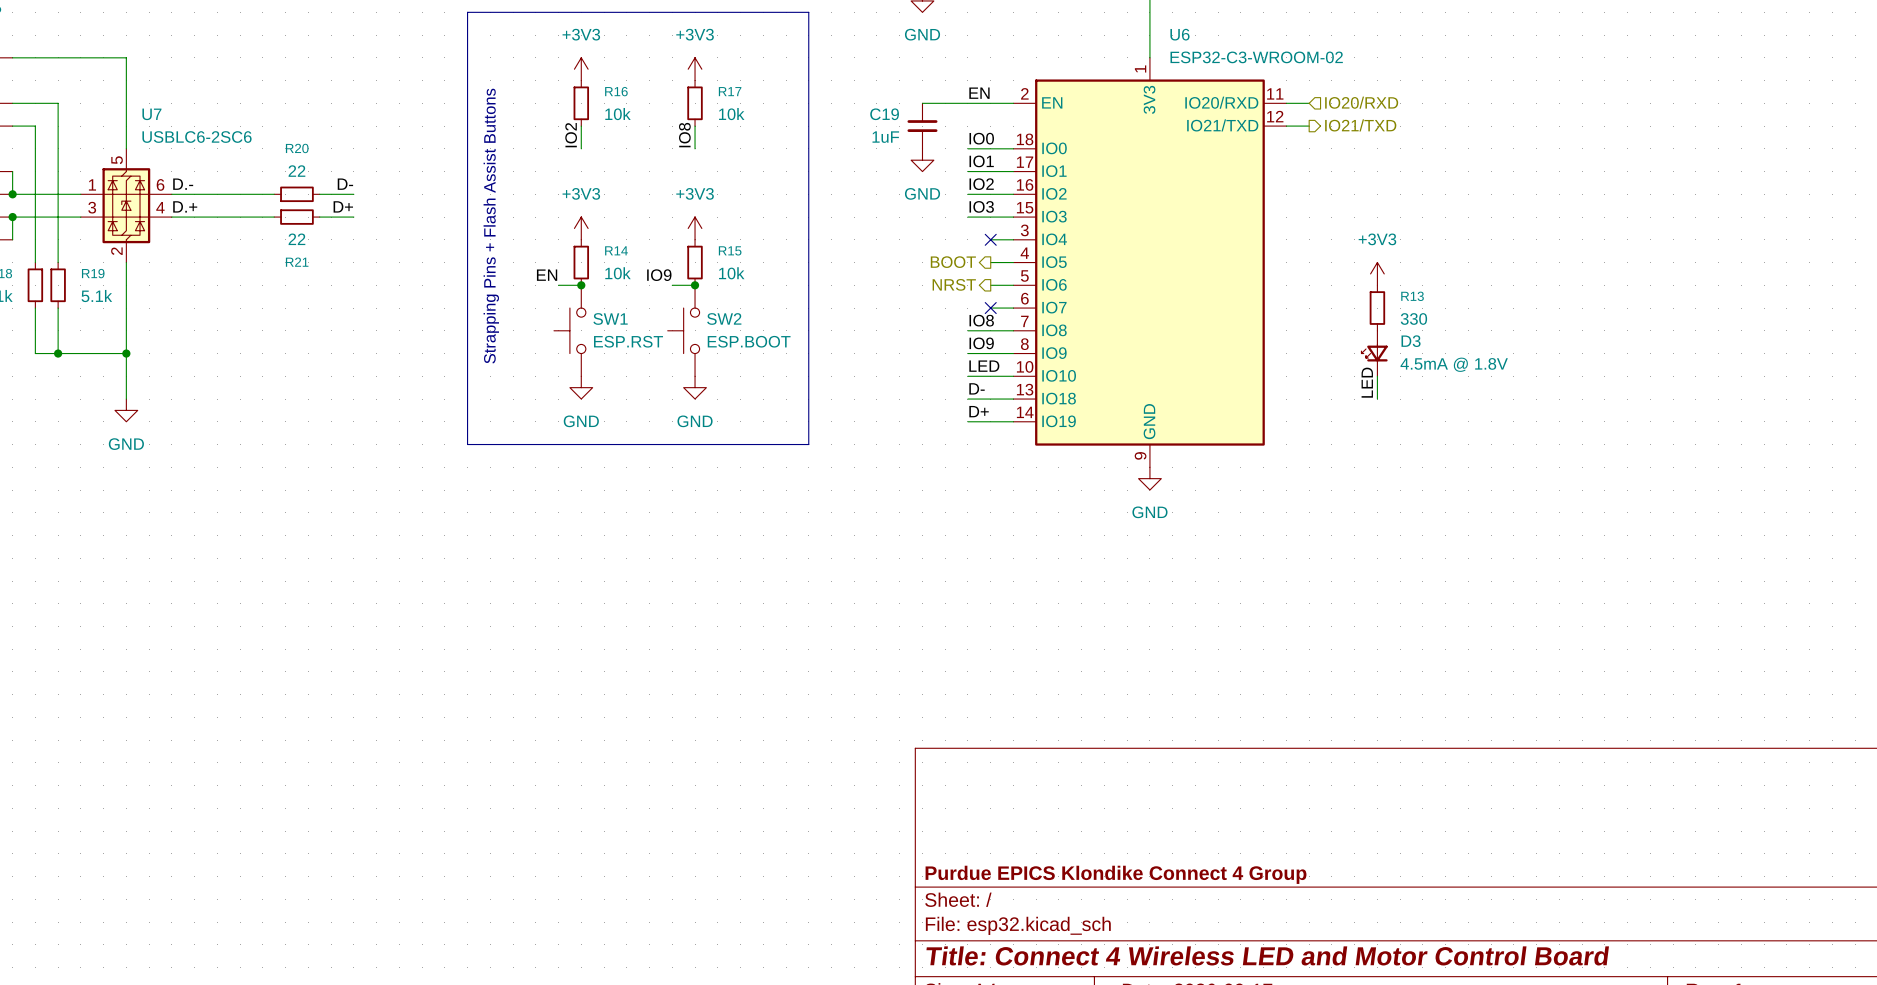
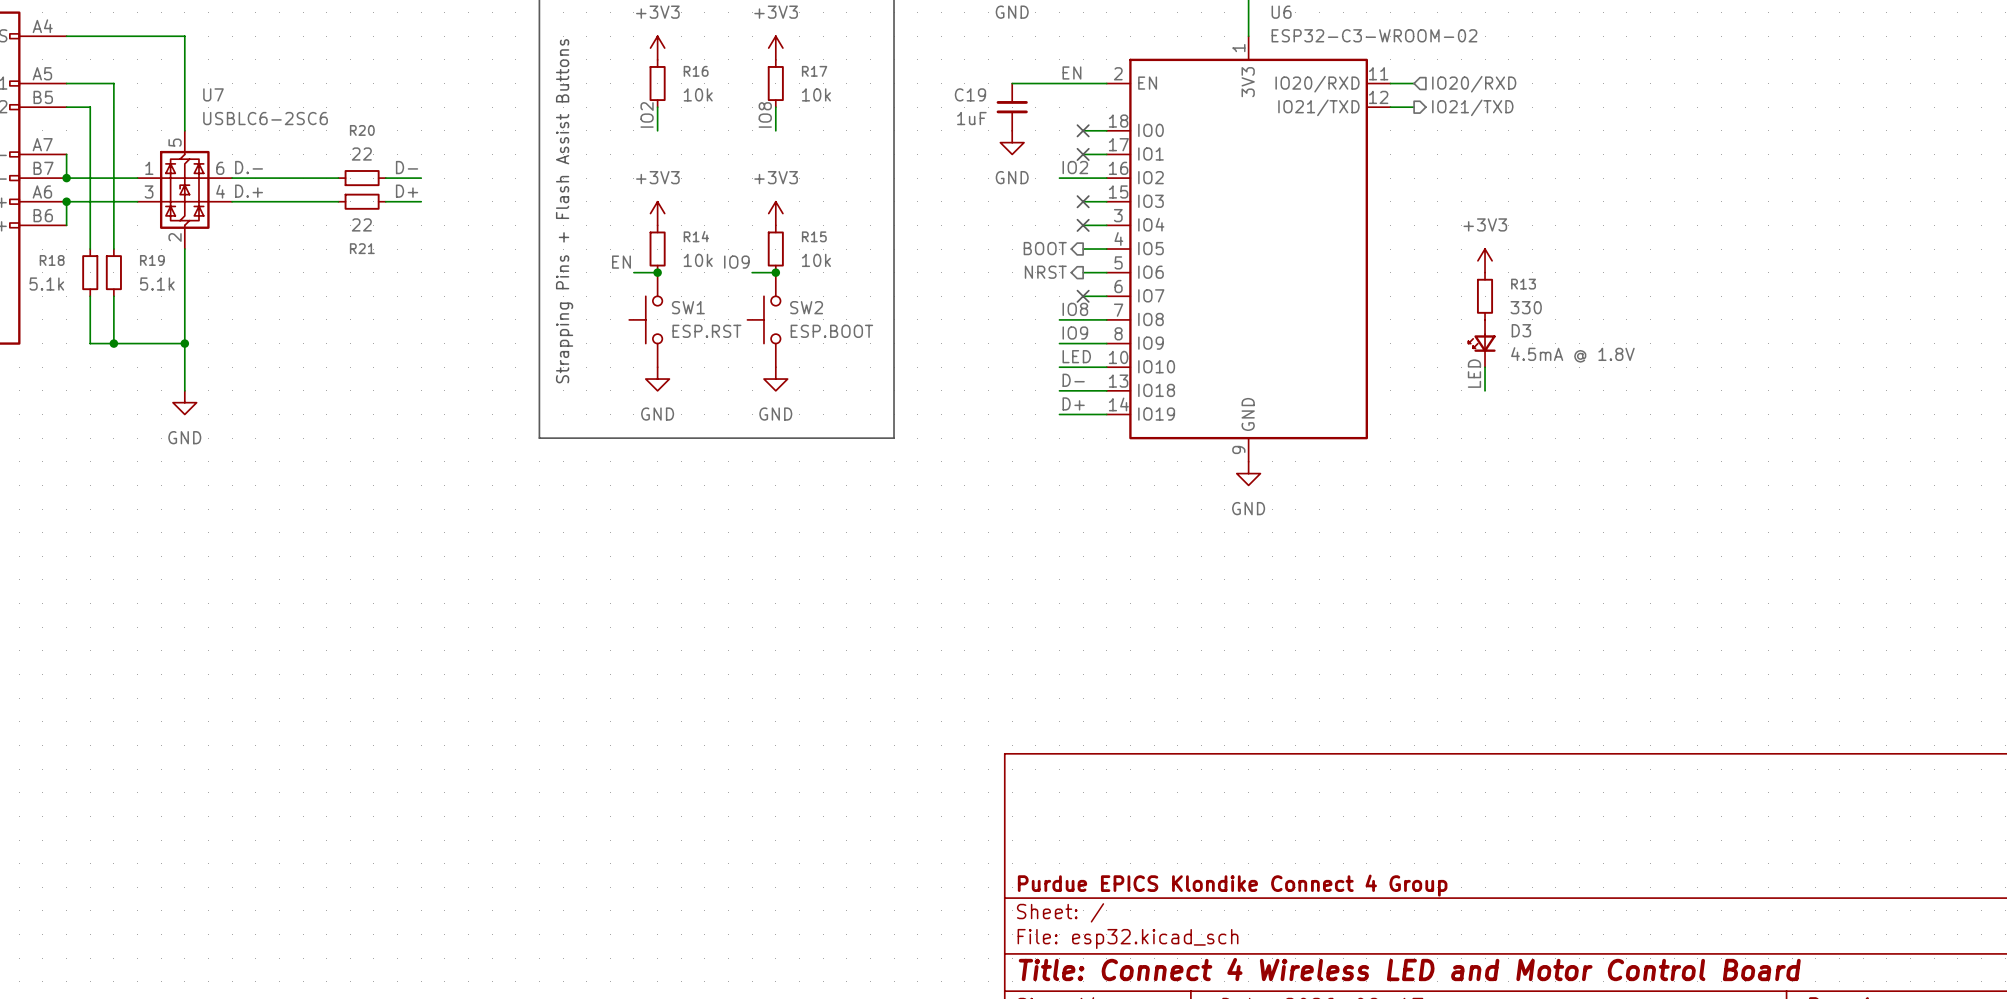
label: IO0 (981, 138) -> none
wire: (967, 148) (990, 148) -> none
no-connect mark: none -> (1083, 130)
label: IO1 (981, 161) -> none
wire: (967, 171) (990, 171) -> none
no-connect mark: none -> (1083, 154)
label: IO3 (981, 206) -> none
wire: (967, 217) (990, 217) -> none
no-connect mark: none -> (1083, 201)

